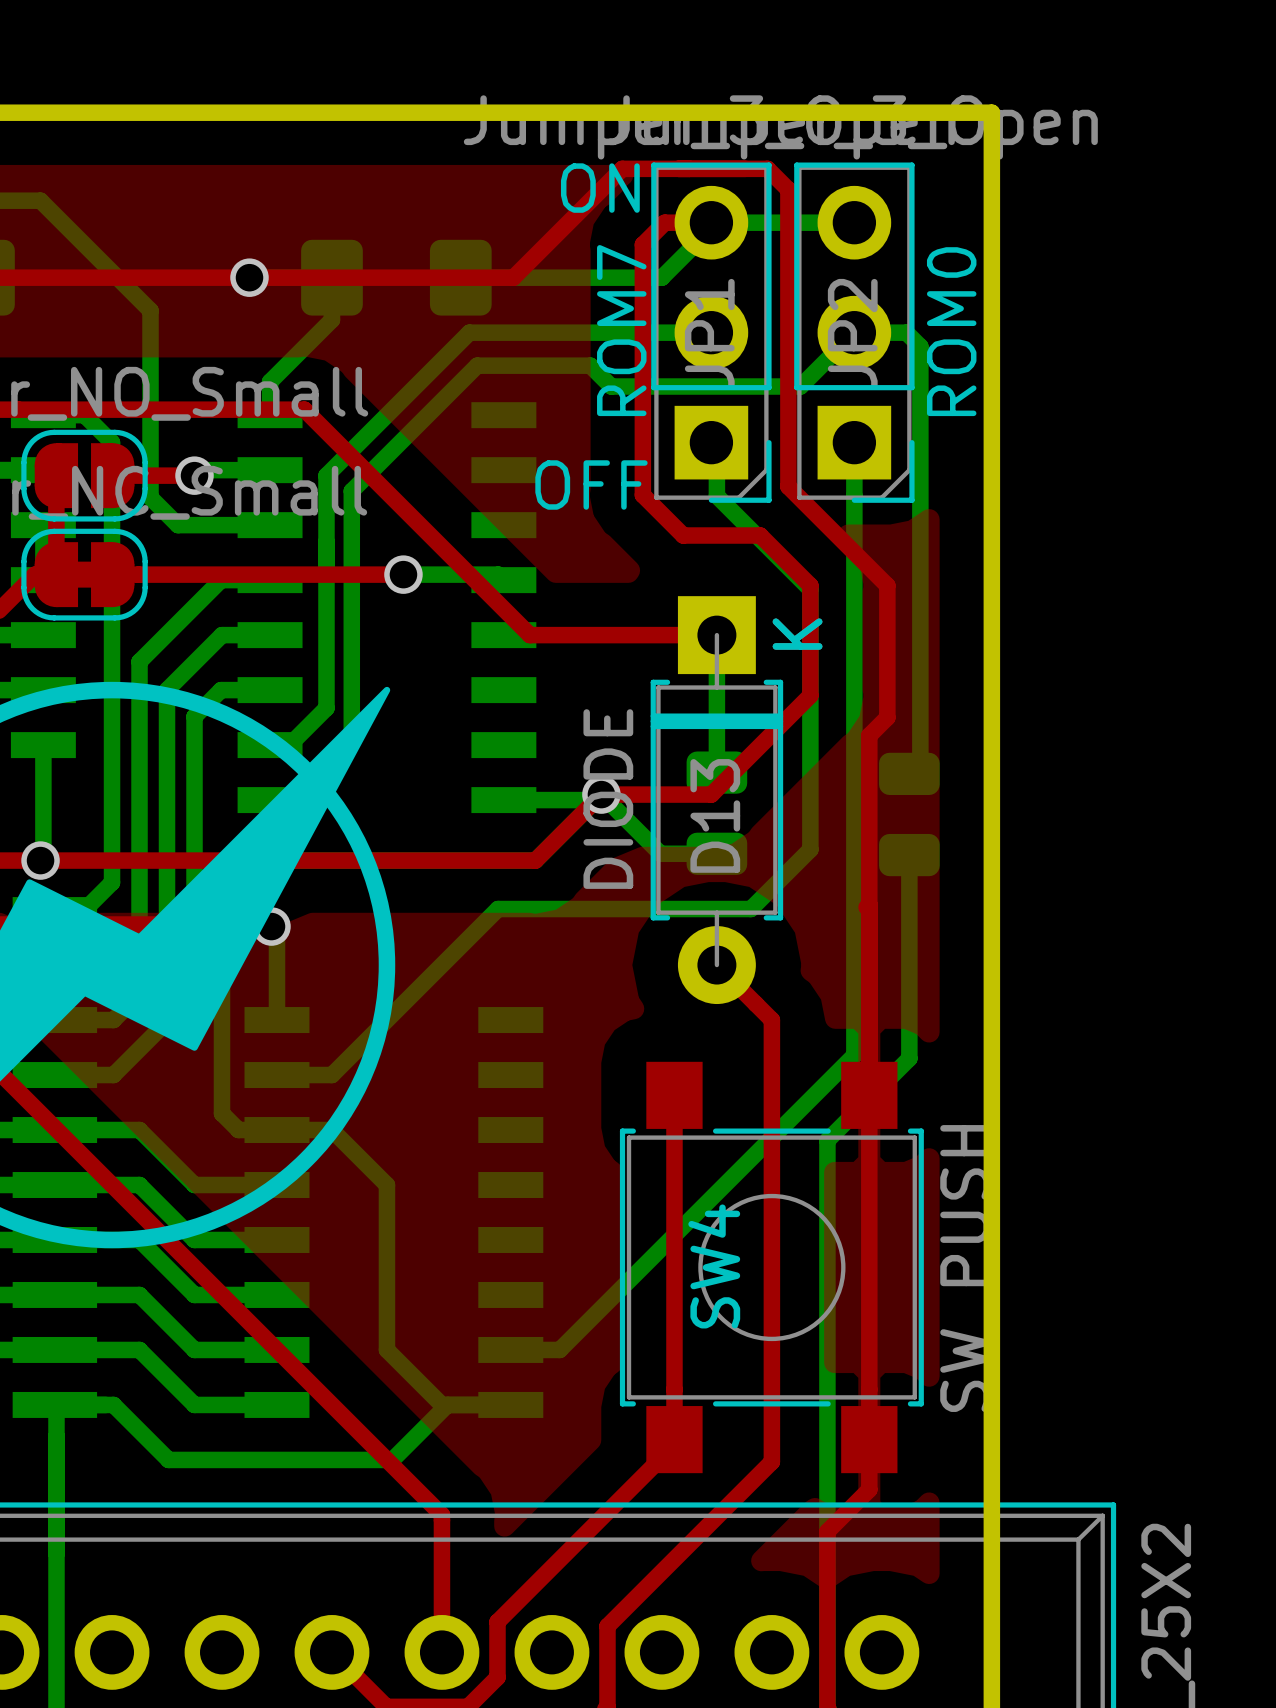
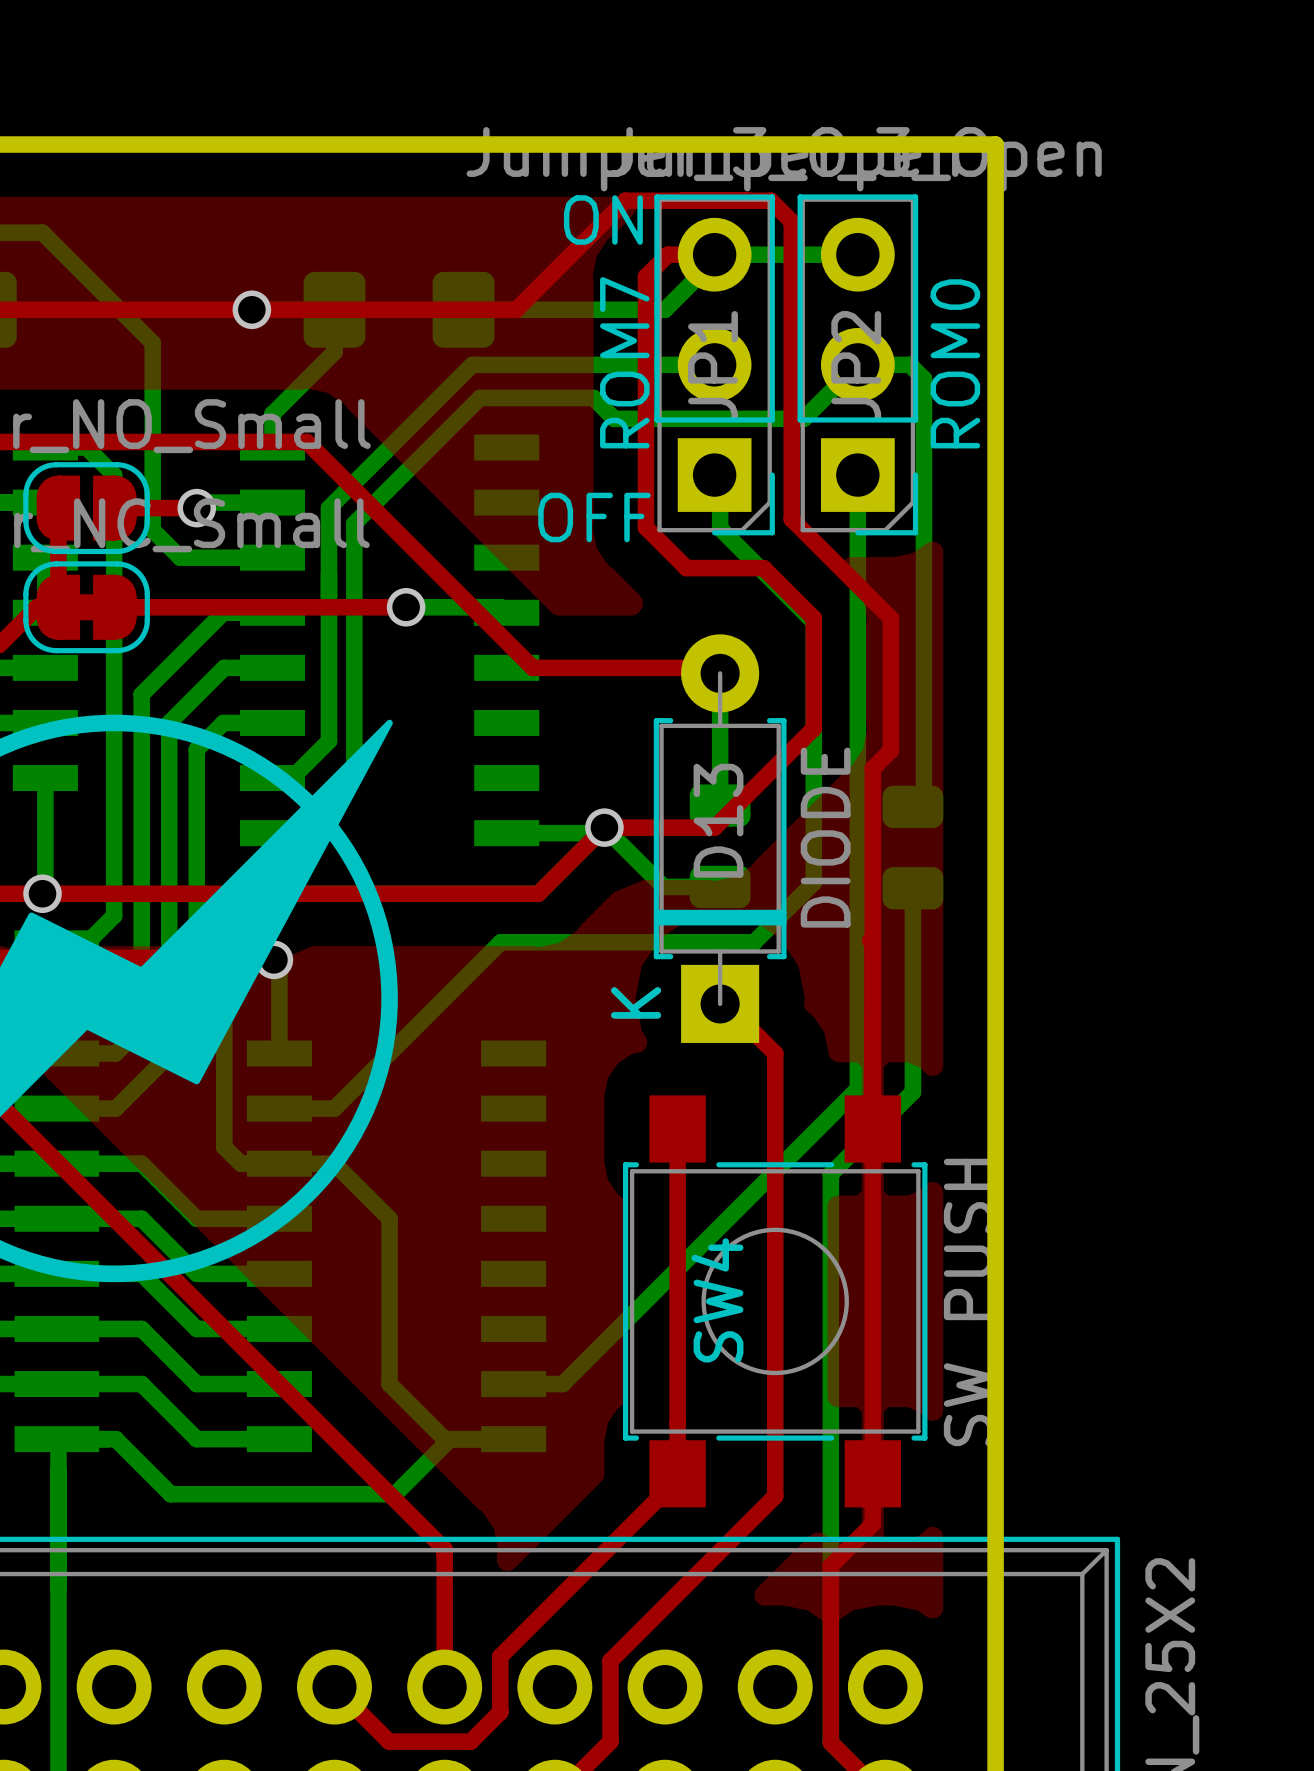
D13 rotation: 0° (716, 800) -> 180° (720, 838)

